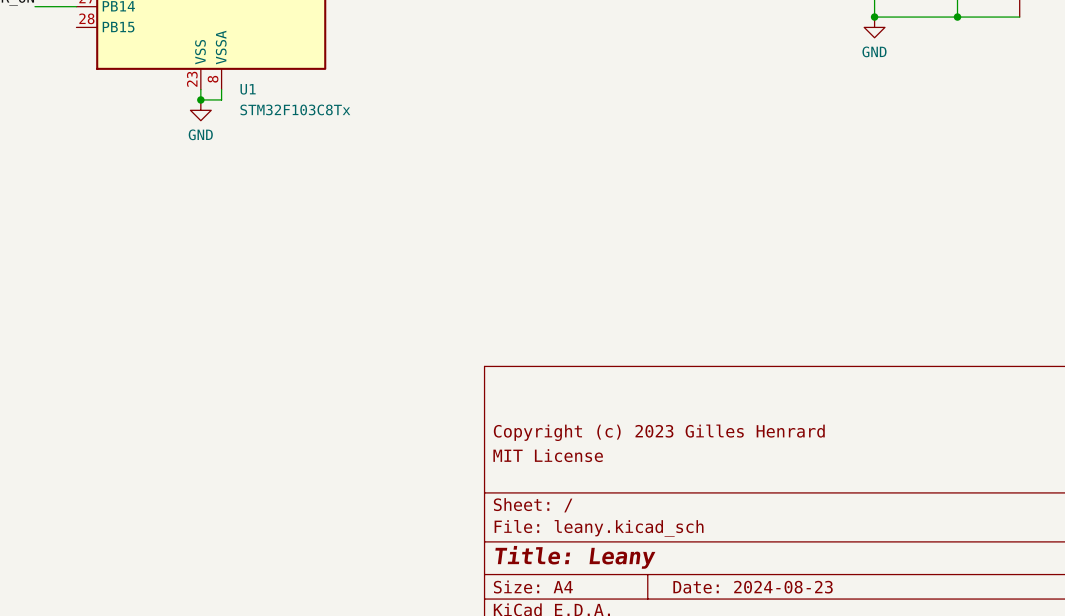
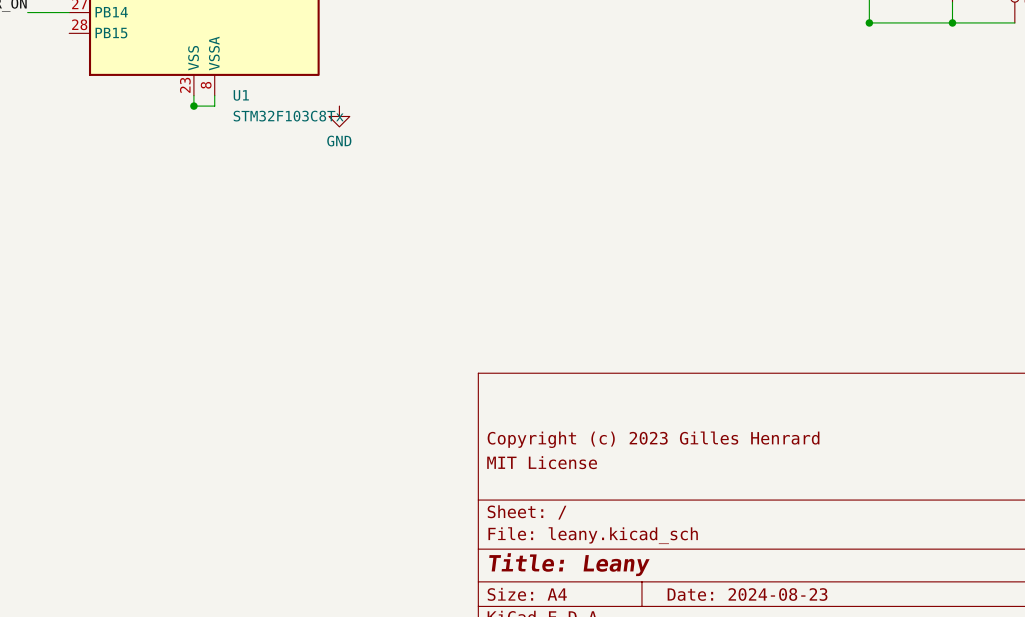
power symbol: GND (874, 27) -> none
power symbol position: GND (200, 110) -> GND (339, 116)

